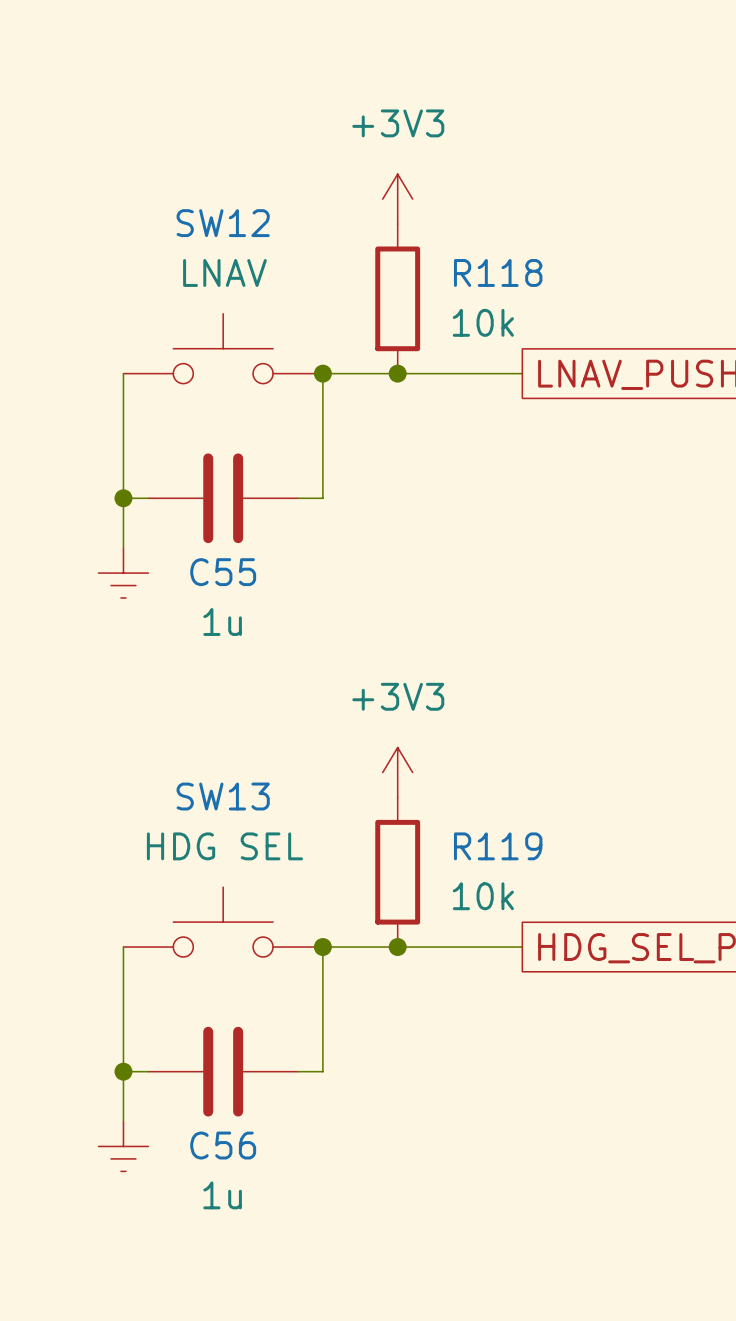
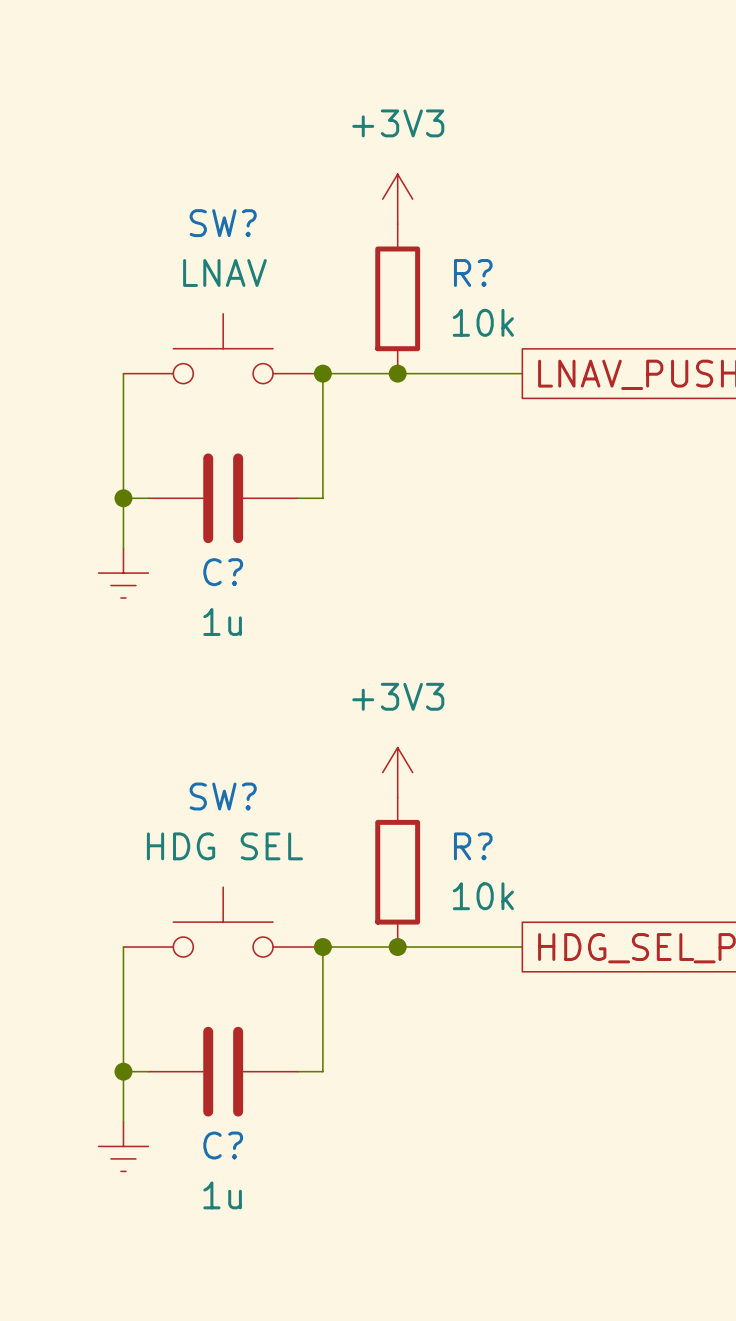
SW12 name: SW12 (223, 223) -> SW? (223, 223)
R118 name: R118 (498, 272) -> R? (473, 272)
C55 name: C55 (223, 572) -> C? (223, 572)
SW13 name: SW13 (223, 796) -> SW? (223, 796)
R119 name: R119 (498, 846) -> R? (473, 846)
C56 name: C56 (223, 1145) -> C? (223, 1145)

